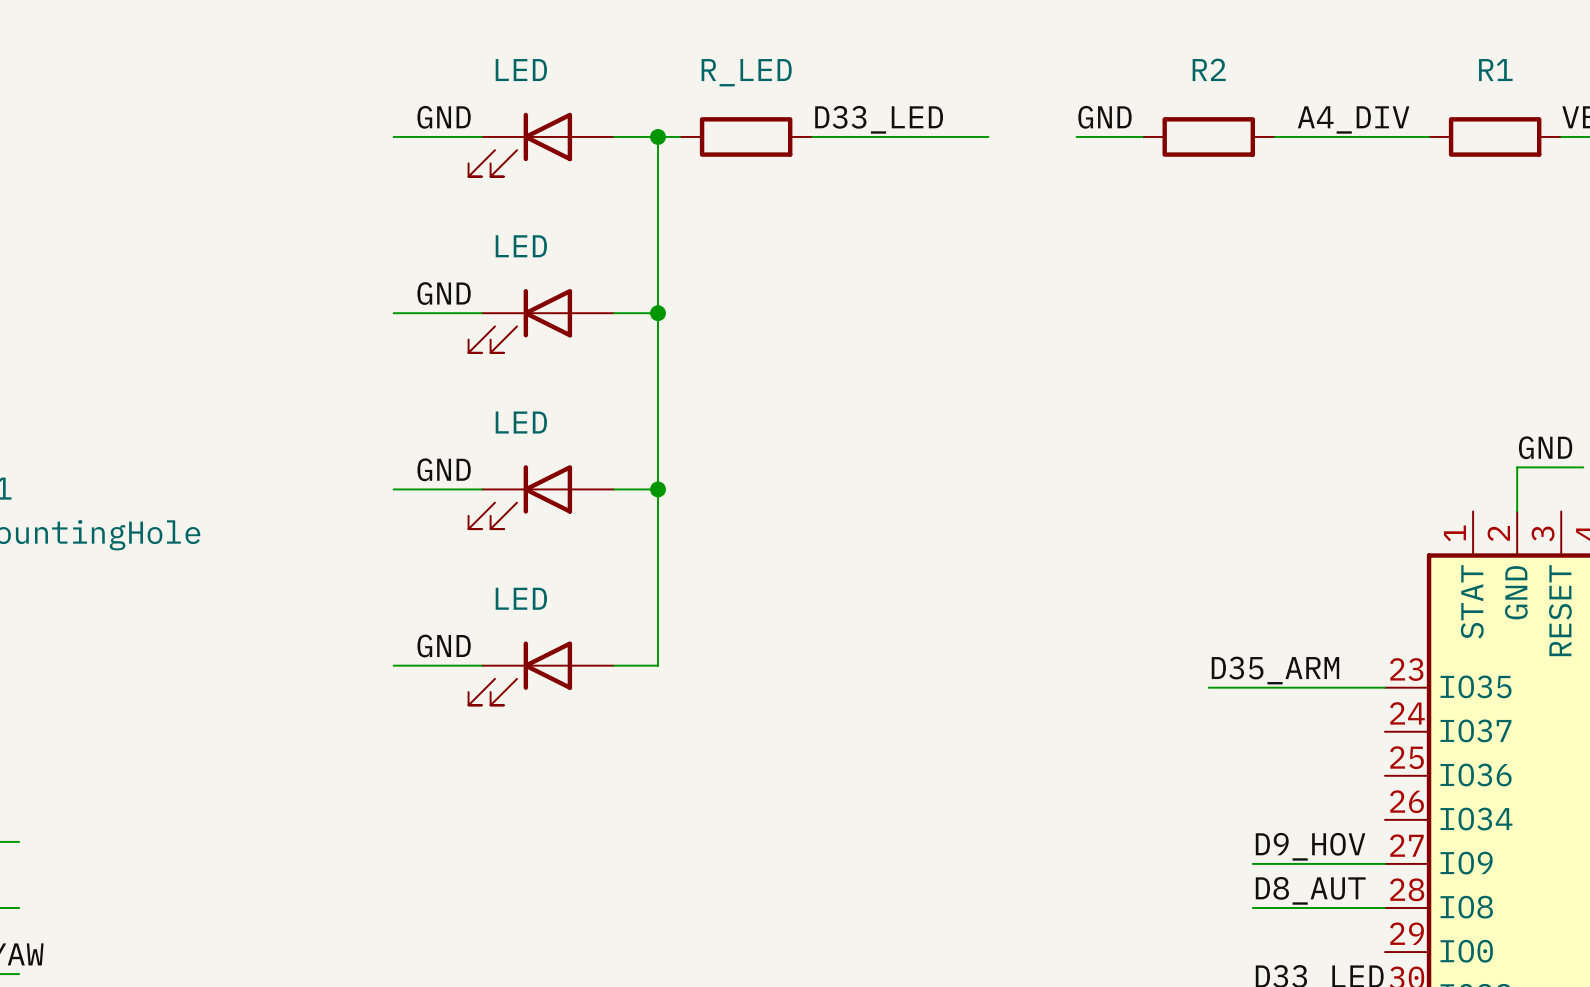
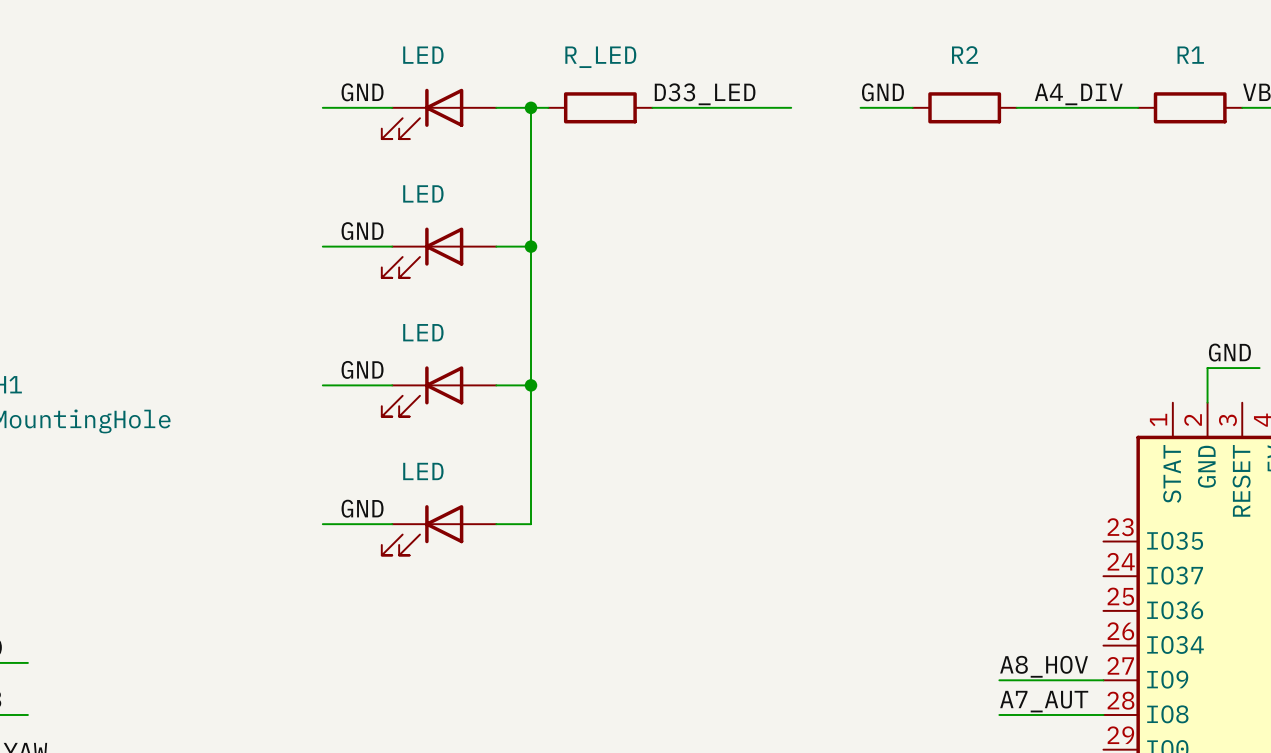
label: D35_ARM (1275, 670) -> none
wire: (1208, 687) (1384, 687) -> none
label: D9_HOV (1310, 846) -> A8_HOV (1044, 666)
label: D8_AUT (1310, 890) -> A7_AUT (1044, 701)

